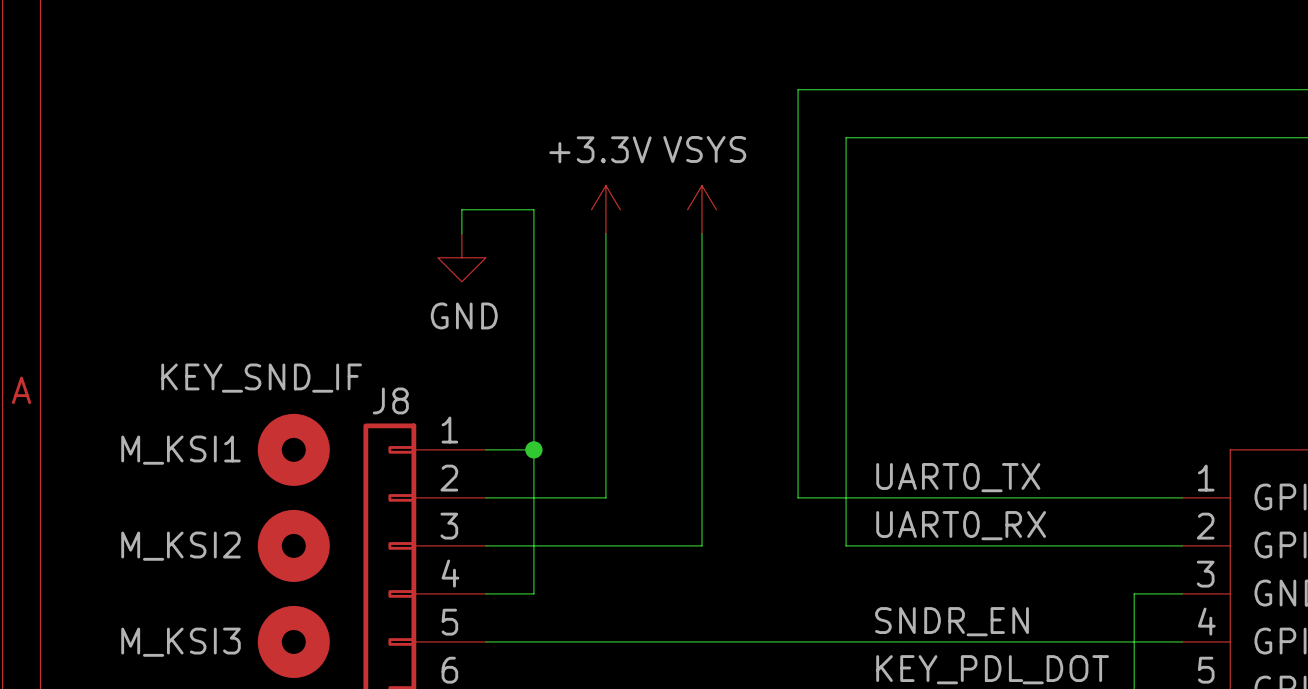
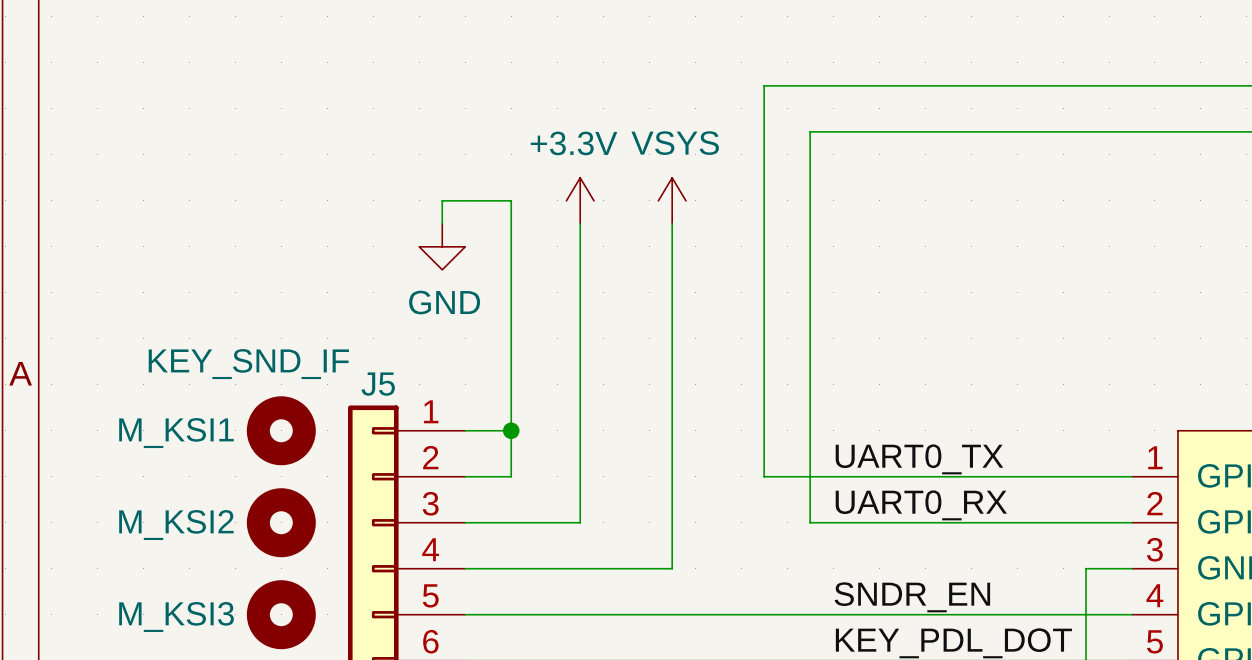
J8 name: J8 (390, 400) -> J5 (378, 384)
wire: (605, 497) (533, 497) (533, 593) -> (580, 476) (580, 522)
wire: (605, 545) (701, 545) -> (511, 568) (672, 568) (672, 522)

